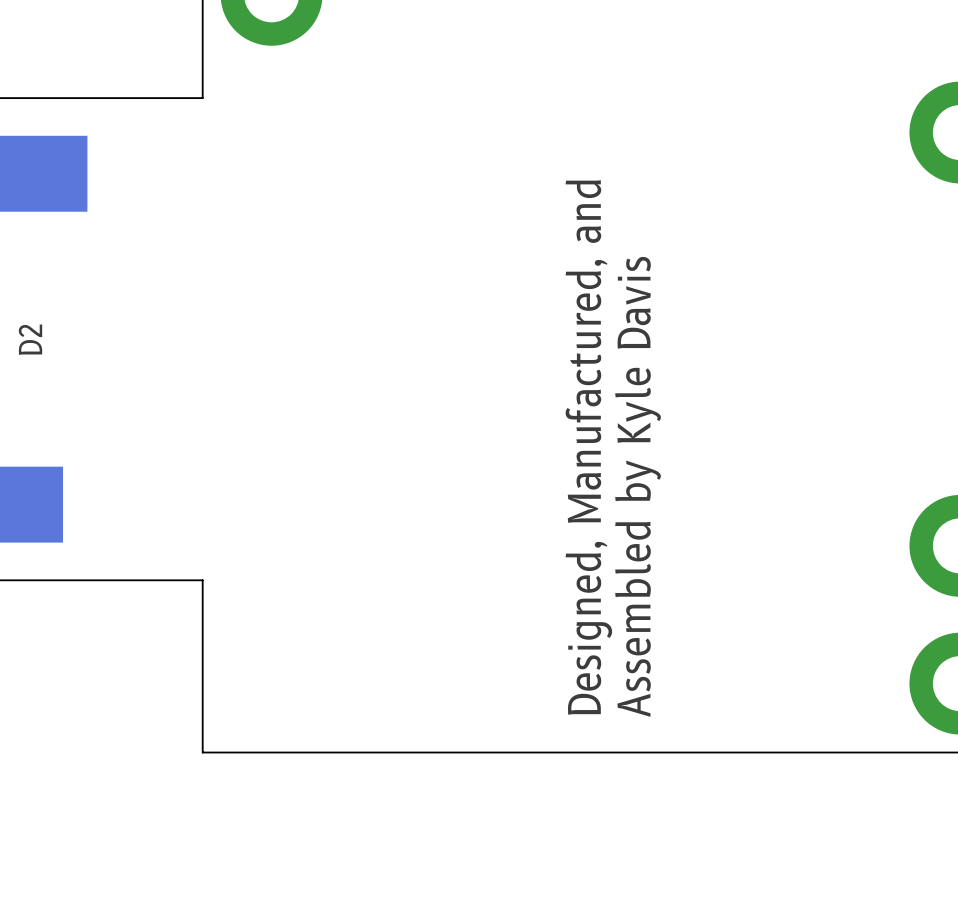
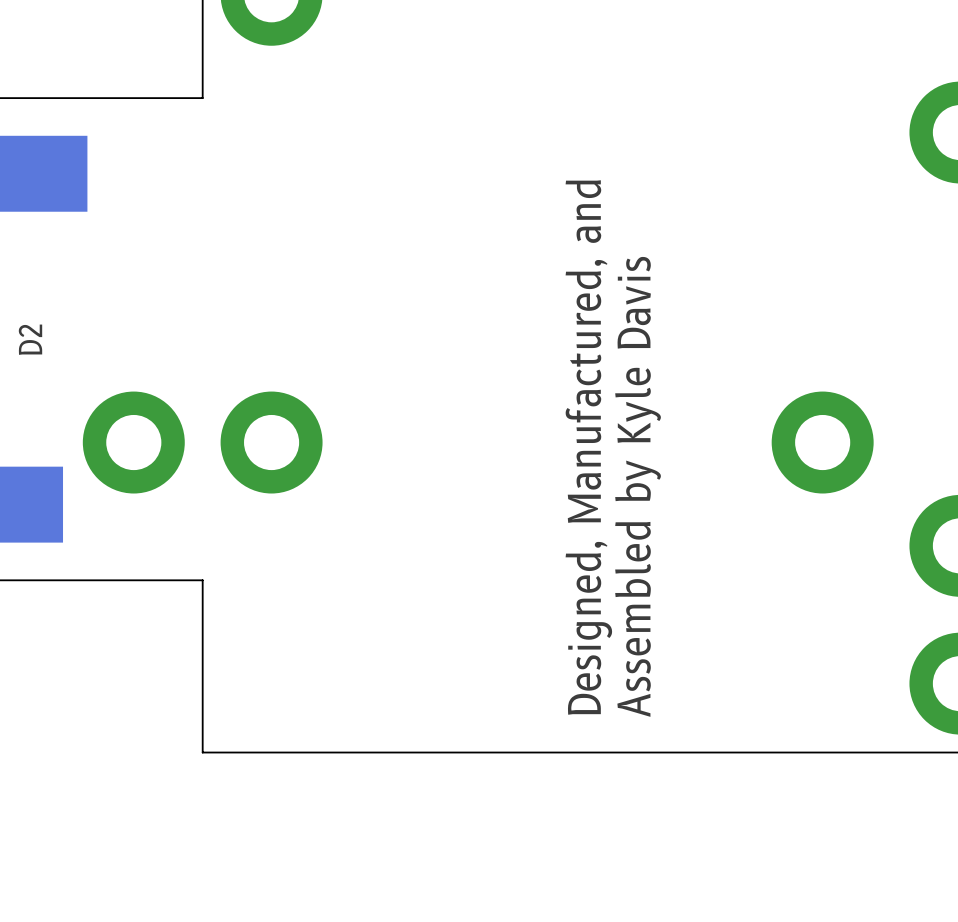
part: none -> (133, 442)
part: none -> (271, 442)
part: none -> (822, 442)

